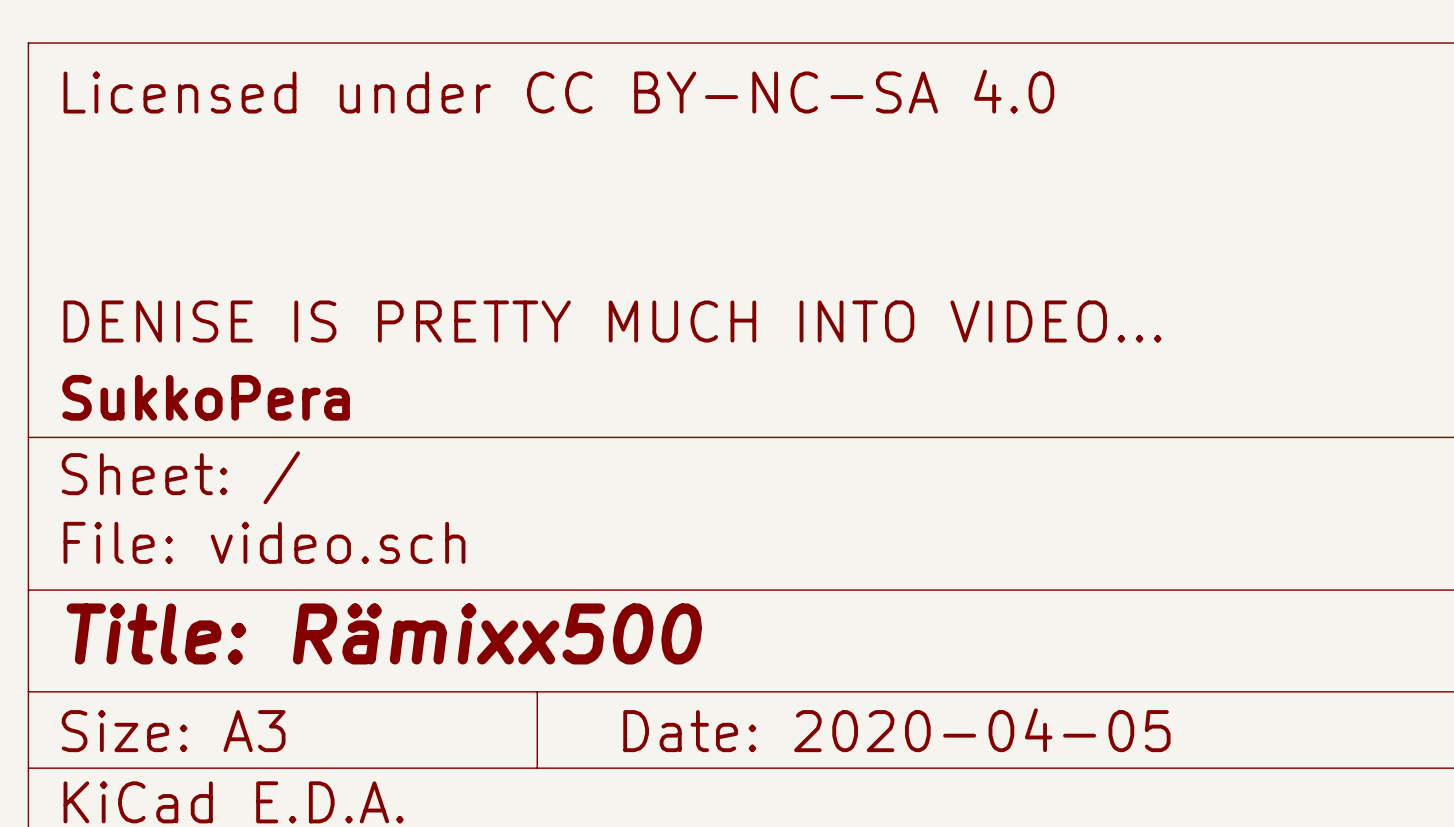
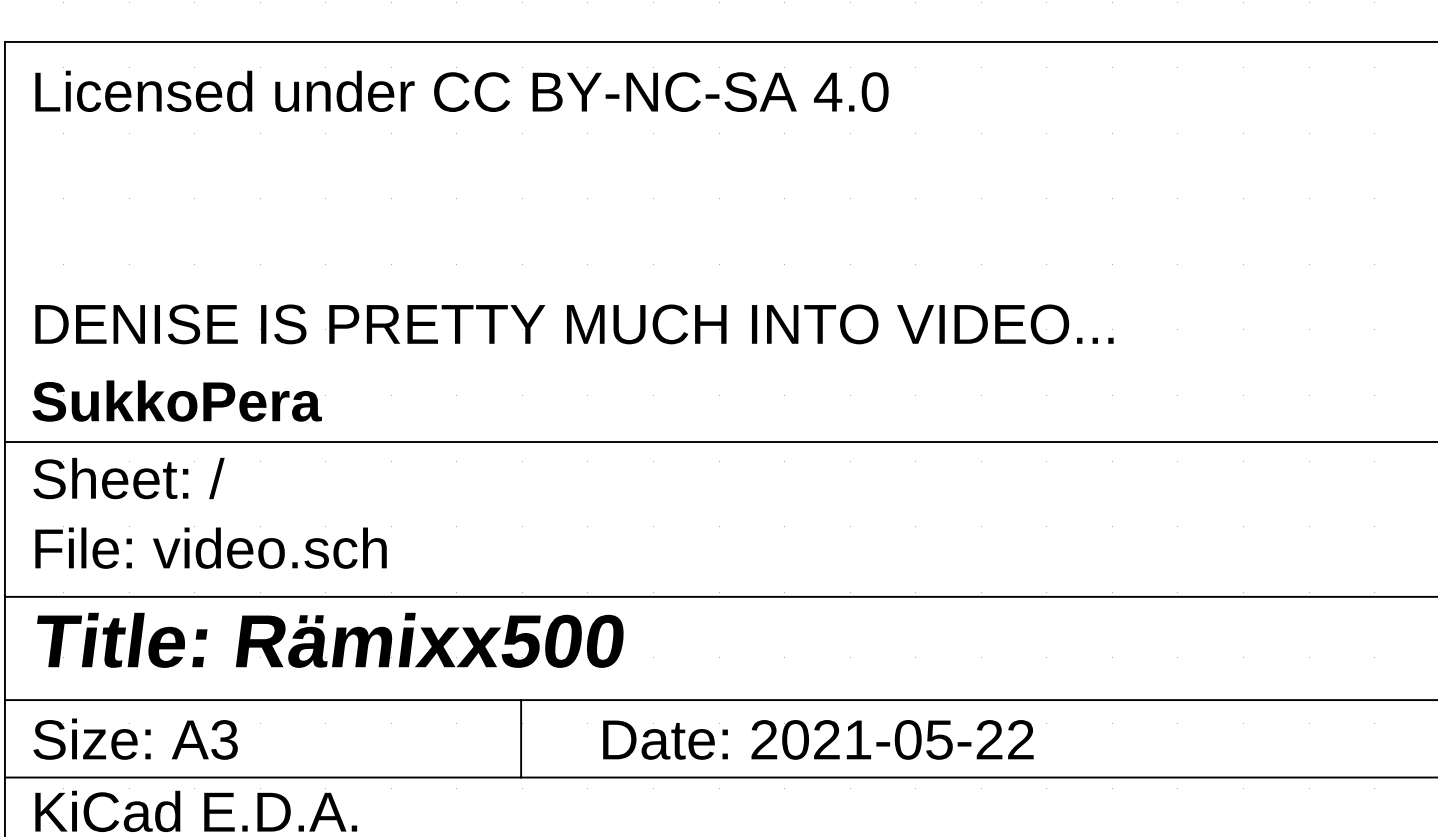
title block: Date: 2020-04-05 (896, 730) -> Date: 2021-05-22 (818, 739)

